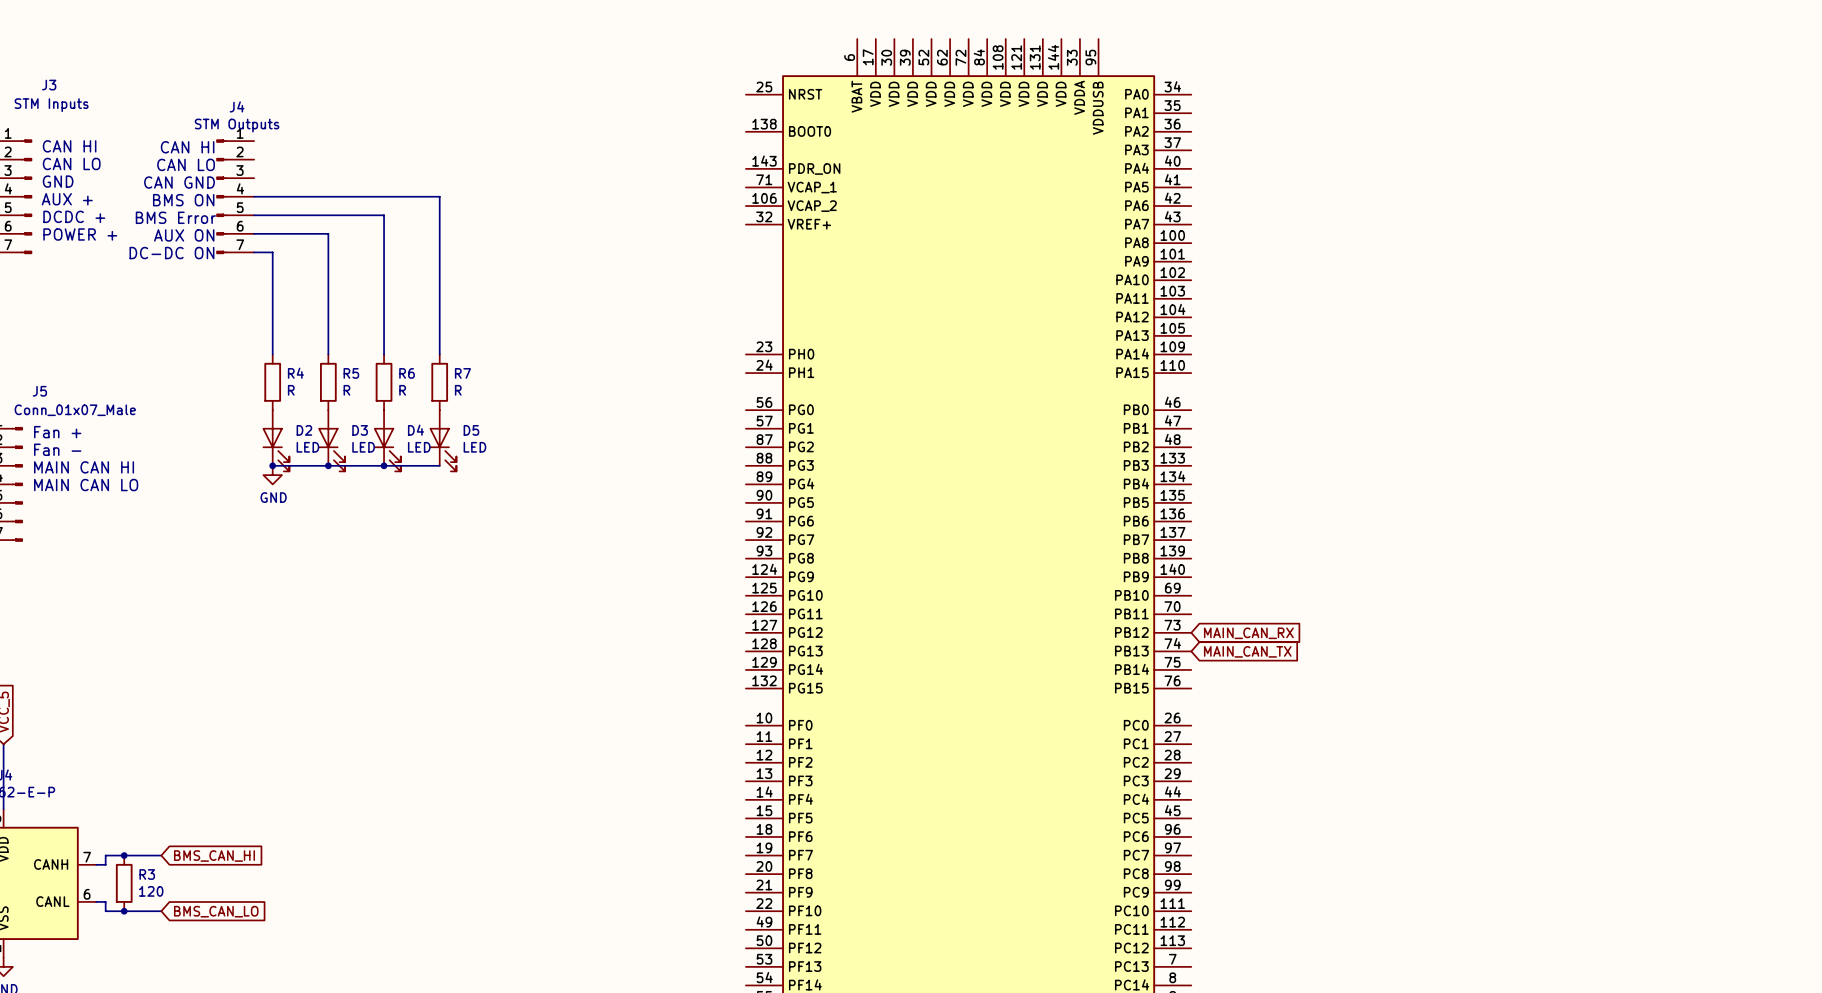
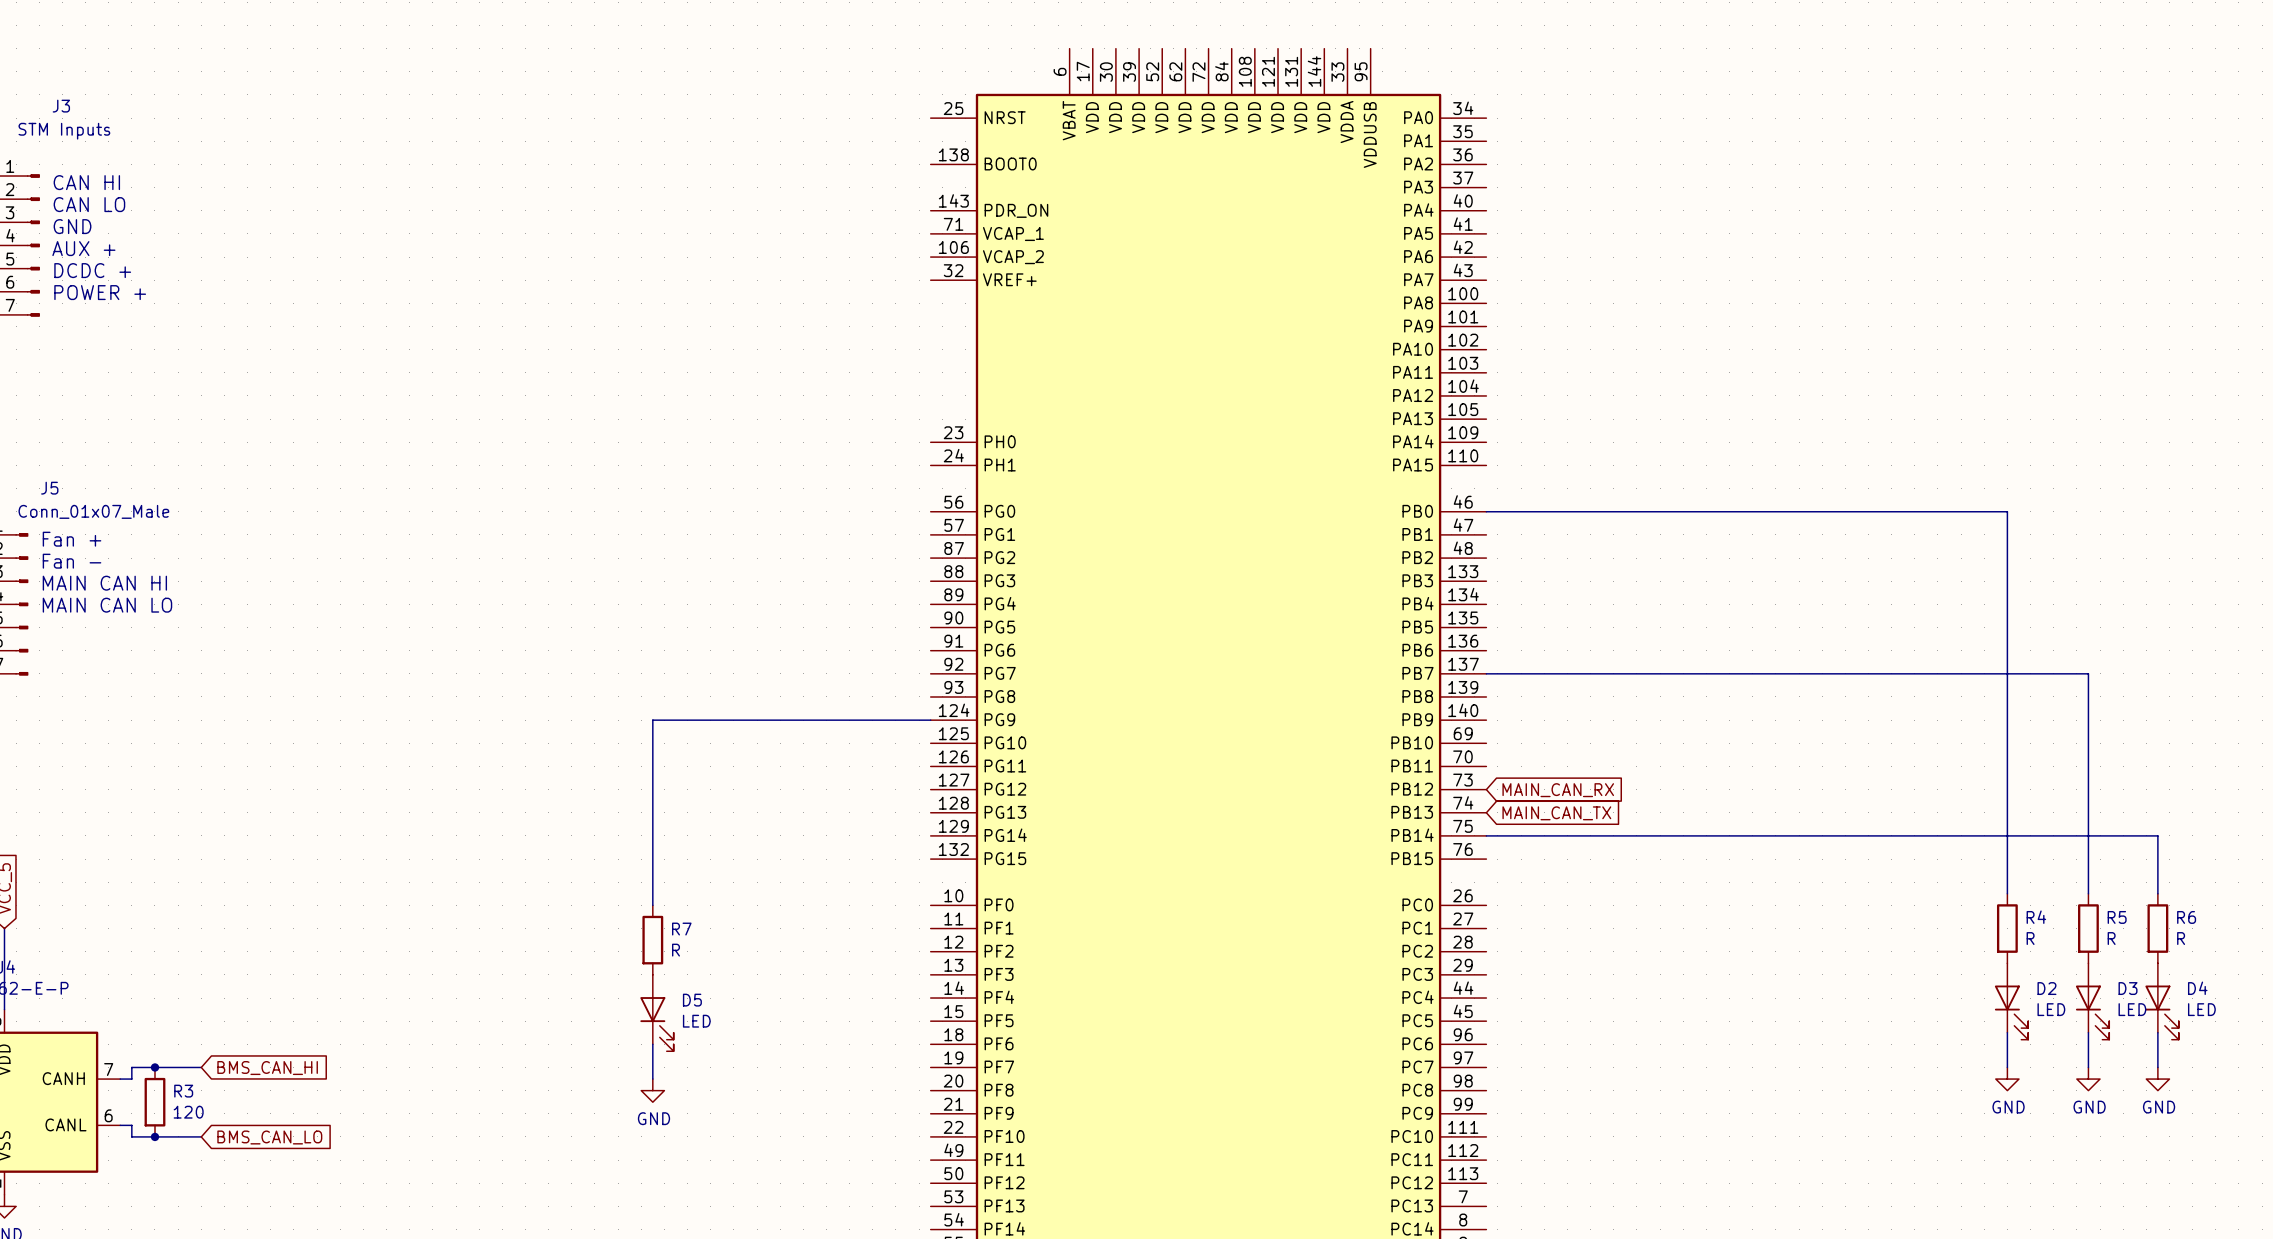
text: CAN HI (187, 147) -> none
text: CAN LO (186, 164) -> none
text: CAN GND (179, 182) -> none
J4: STM Outputs (235, 196) -> none
wire: (254, 196) (439, 196) (439, 354) -> none
text: BMS ON (183, 200) -> none
wire: (254, 215) (384, 215) (384, 354) -> none
text: BMS Error (175, 217) -> none
wire: (254, 233) (328, 233) (328, 354) -> none
text: AUX ON (184, 235) -> none
wire: (254, 252) (272, 252) (272, 354) -> none
text: DC-DC ON (171, 253) -> none
R4 position: (272, 382) -> (2007, 928)
R5 position: (328, 382) -> (2088, 928)
R6 position: (384, 382) -> (2157, 928)
R7 position: (439, 382) -> (652, 940)
wire: none -> (1486, 511) (2007, 511) (2007, 893)
D2 position: (276, 440) -> (2011, 1001)
D3 position: (331, 440) -> (2092, 1001)
D4 position: (387, 440) -> (2162, 1001)
D5 position: (443, 440) -> (656, 1013)
wire: (272, 465) (439, 465) -> none
junction: (272, 465) -> none
junction: (328, 465) -> none
junction: (384, 465) -> none
power symbol: GND (272, 475) -> none
wire: none -> (1486, 673) (2088, 673) (2088, 893)
wire: none -> (930, 720) (652, 720) (652, 905)
wire: none -> (1486, 835) (2157, 835) (2157, 893)
wire: none -> (2007, 1032) (2007, 1067)
wire: none -> (2088, 1032) (2088, 1067)
wire: none -> (2157, 1032) (2157, 1067)
wire: none -> (652, 1044) (652, 1079)
power symbol: none -> GND (2007, 1079)
power symbol: none -> GND (2088, 1079)
power symbol: none -> GND (2157, 1079)
power symbol: none -> GND (652, 1090)

